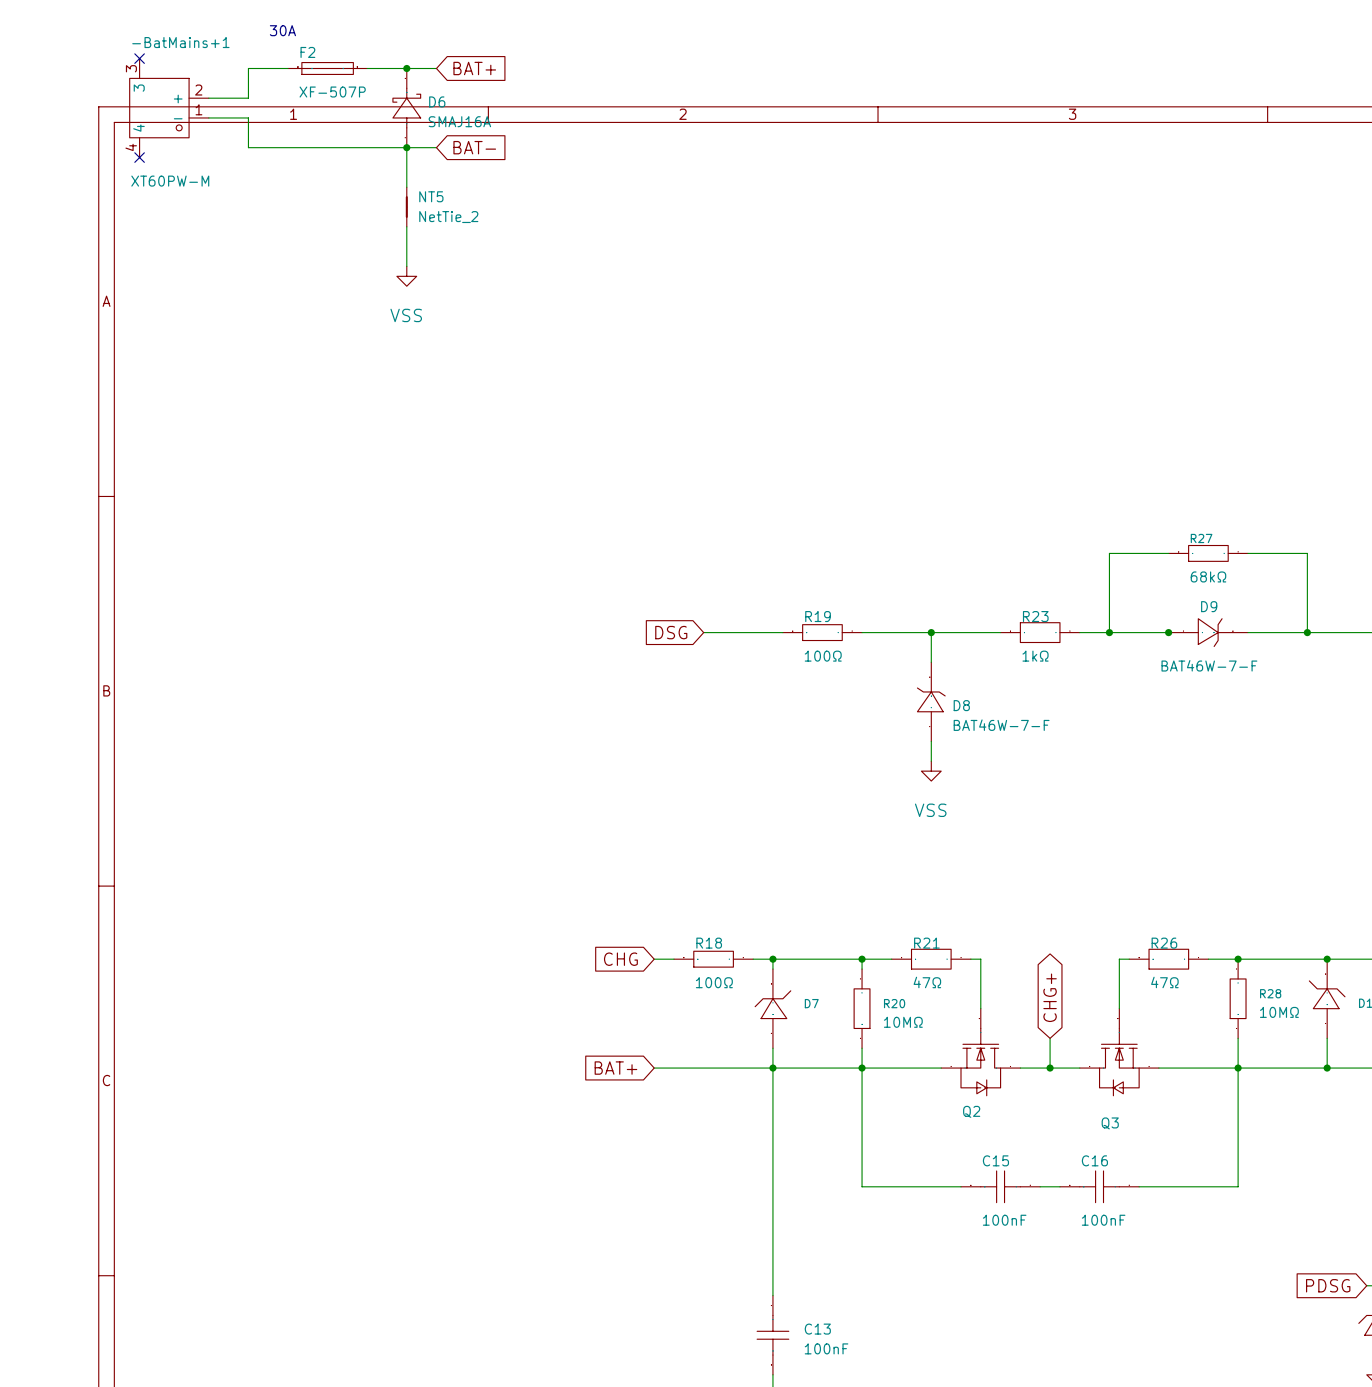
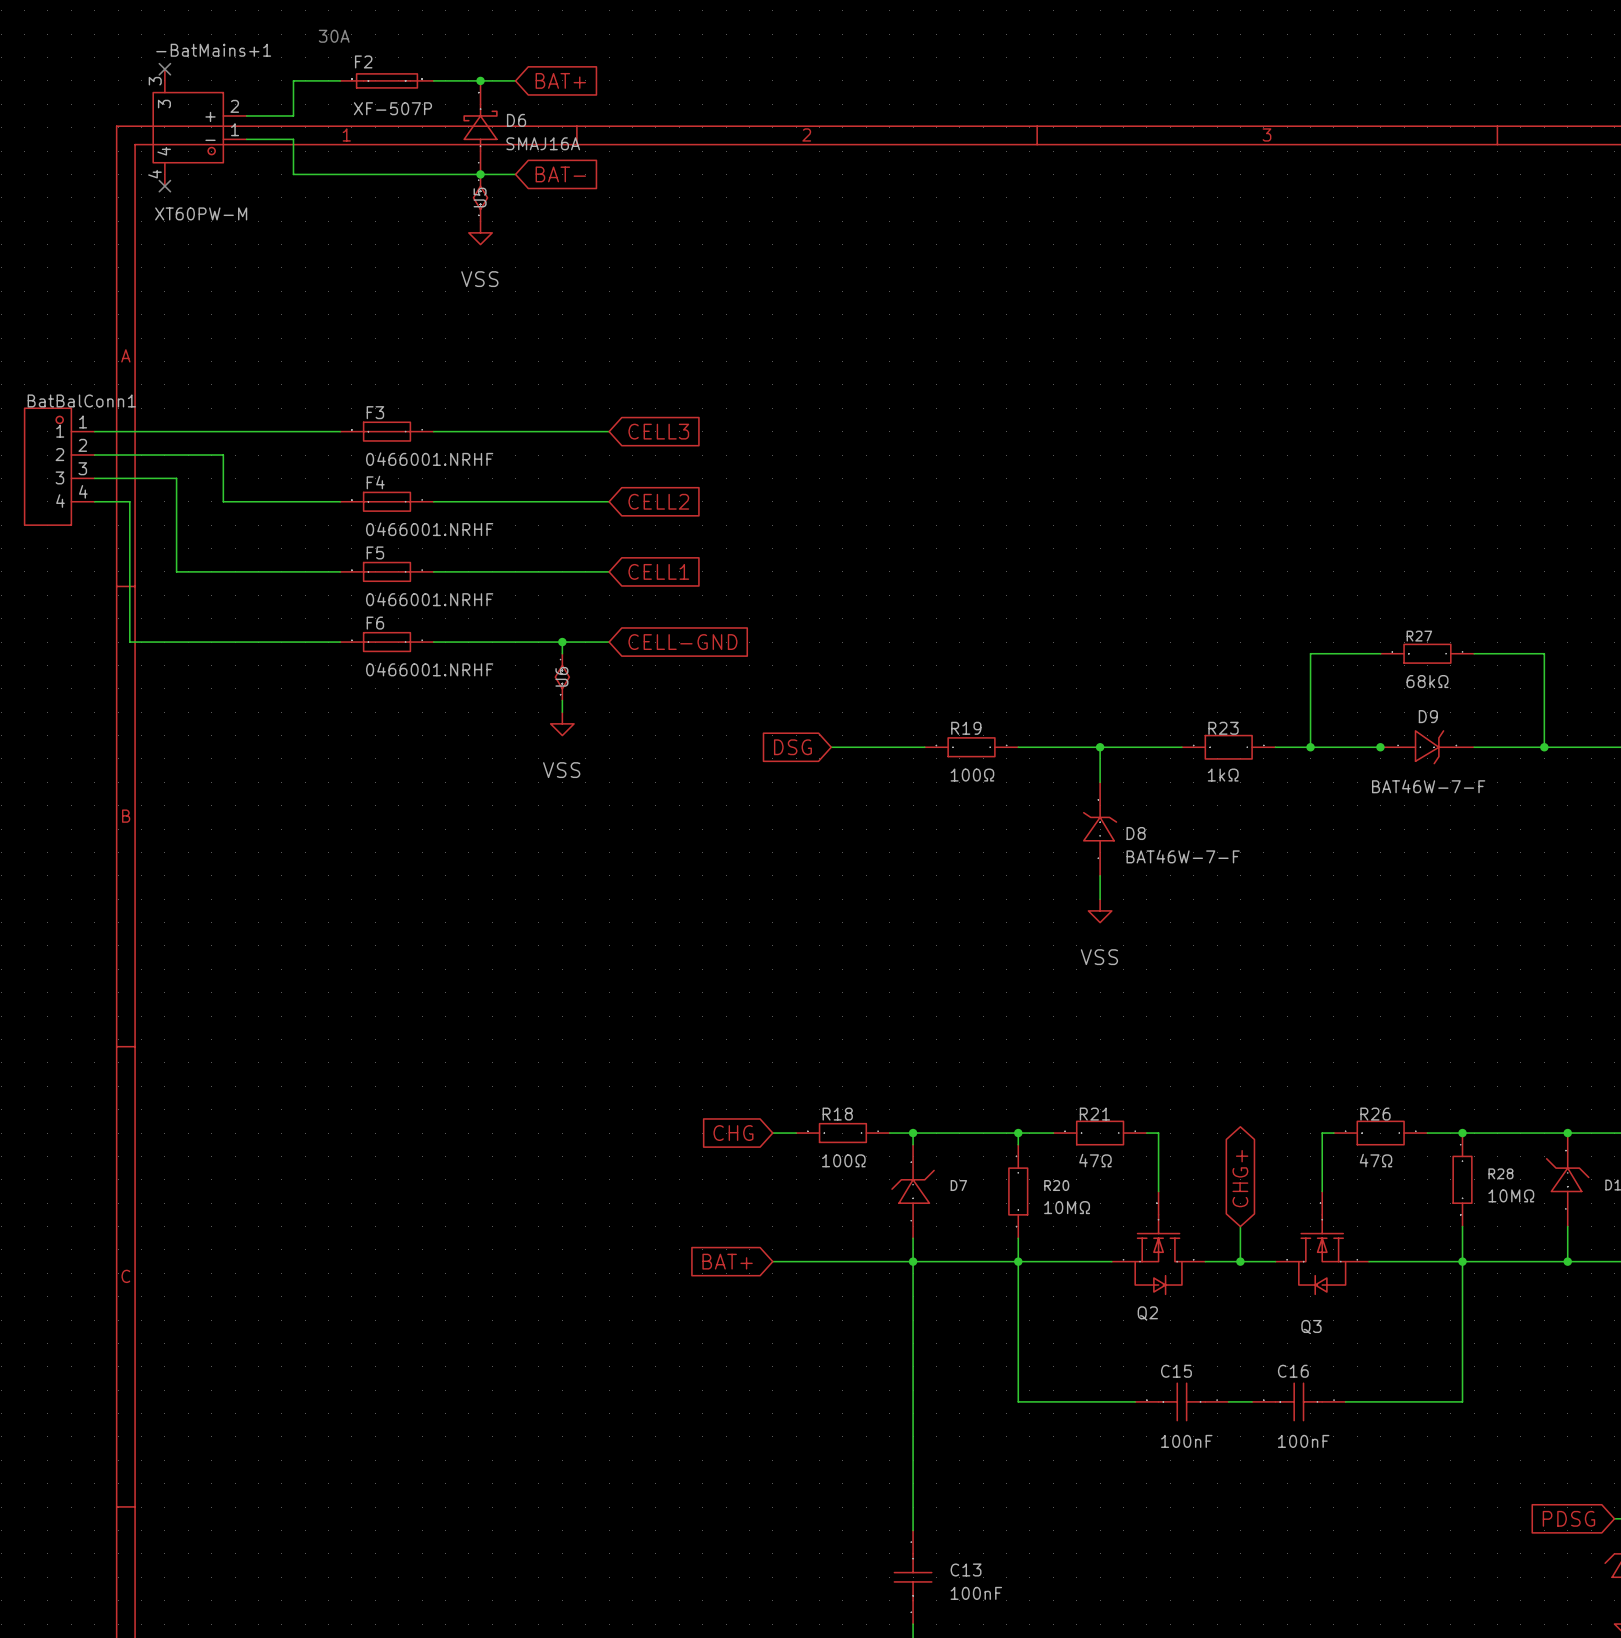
U5: none -> (480, 197)
NT5: NetTie_2 (406, 207) -> none
wire: (406, 226) (406, 266) -> none
power symbol position: VSS (406, 276) -> VSS (480, 232)
wire: none -> (94, 431) (340, 431)
F3: none -> 0466001.NRHF (387, 431)
wire: none -> (433, 431) (609, 431)
global label: none -> CELL3 (658, 431)
wire: none -> (94, 455) (223, 455) (223, 501) (340, 501)
BatBalConn1: none -> (59, 466)
wire: none -> (94, 478) (176, 478) (176, 571) (340, 571)
wire: none -> (94, 501) (129, 501) (129, 642) (340, 642)
F4: none -> 0466001.NRHF (387, 501)
wire: none -> (433, 501) (609, 501)
global label: none -> CELL2 (658, 501)
F5: none -> 0466001.NRHF (387, 571)
wire: none -> (433, 571) (609, 571)
global label: none -> CELL1 (658, 571)
F6: none -> 0466001.NRHF (387, 642)
wire: none -> (433, 642) (609, 642)
wire: none -> (562, 642) (562, 653)
junction: none -> (562, 642)
global label: none -> CELL-GND (682, 642)
U6: none -> (562, 677)
wire: none -> (562, 700) (562, 712)
power symbol: none -> VSS (562, 723)

